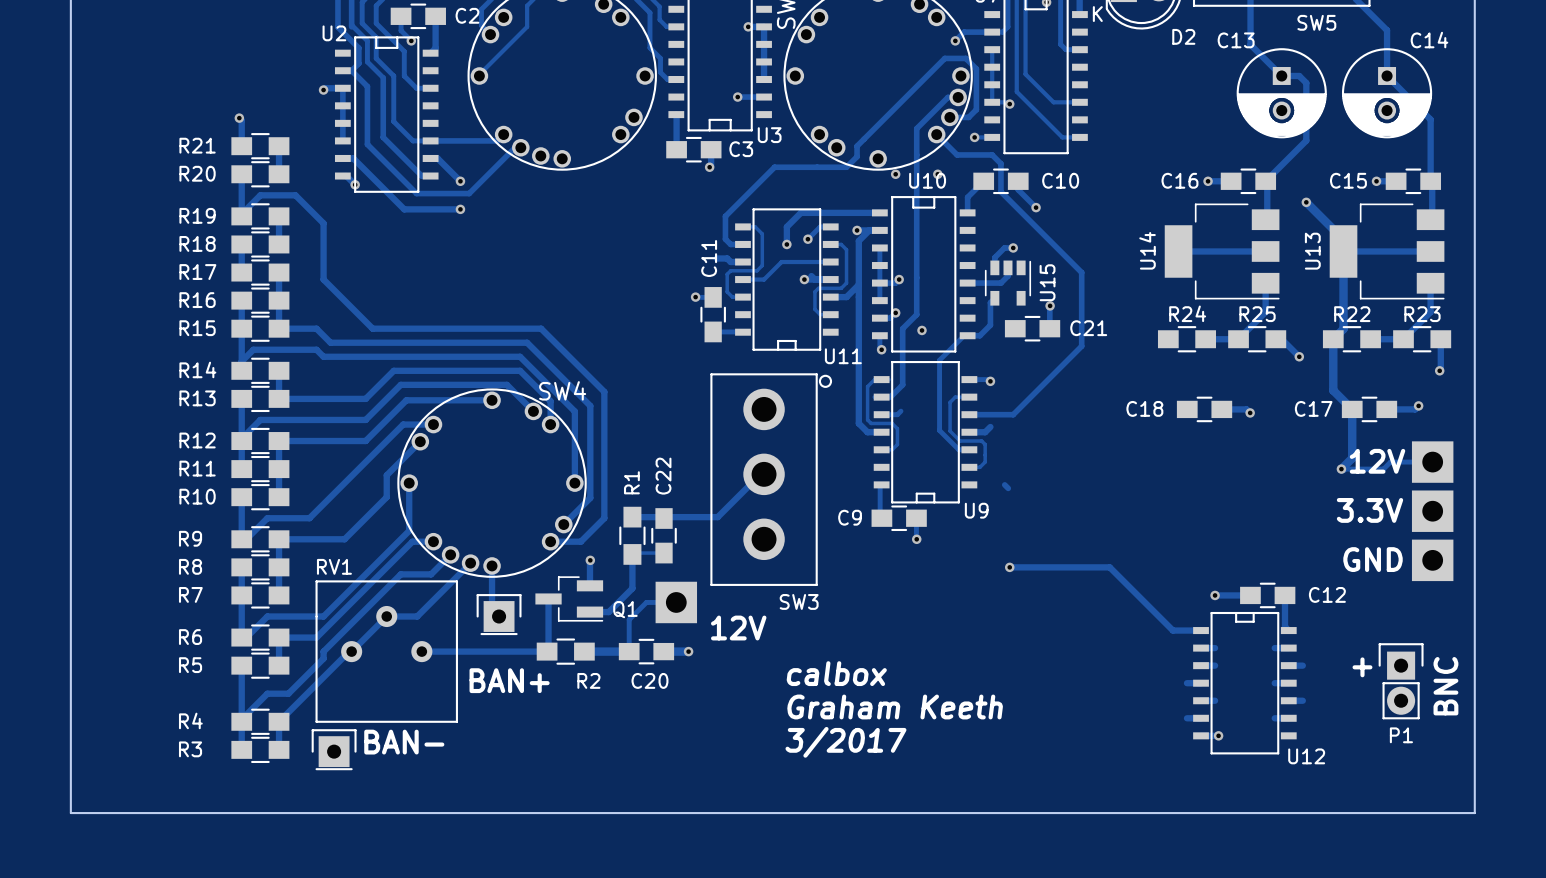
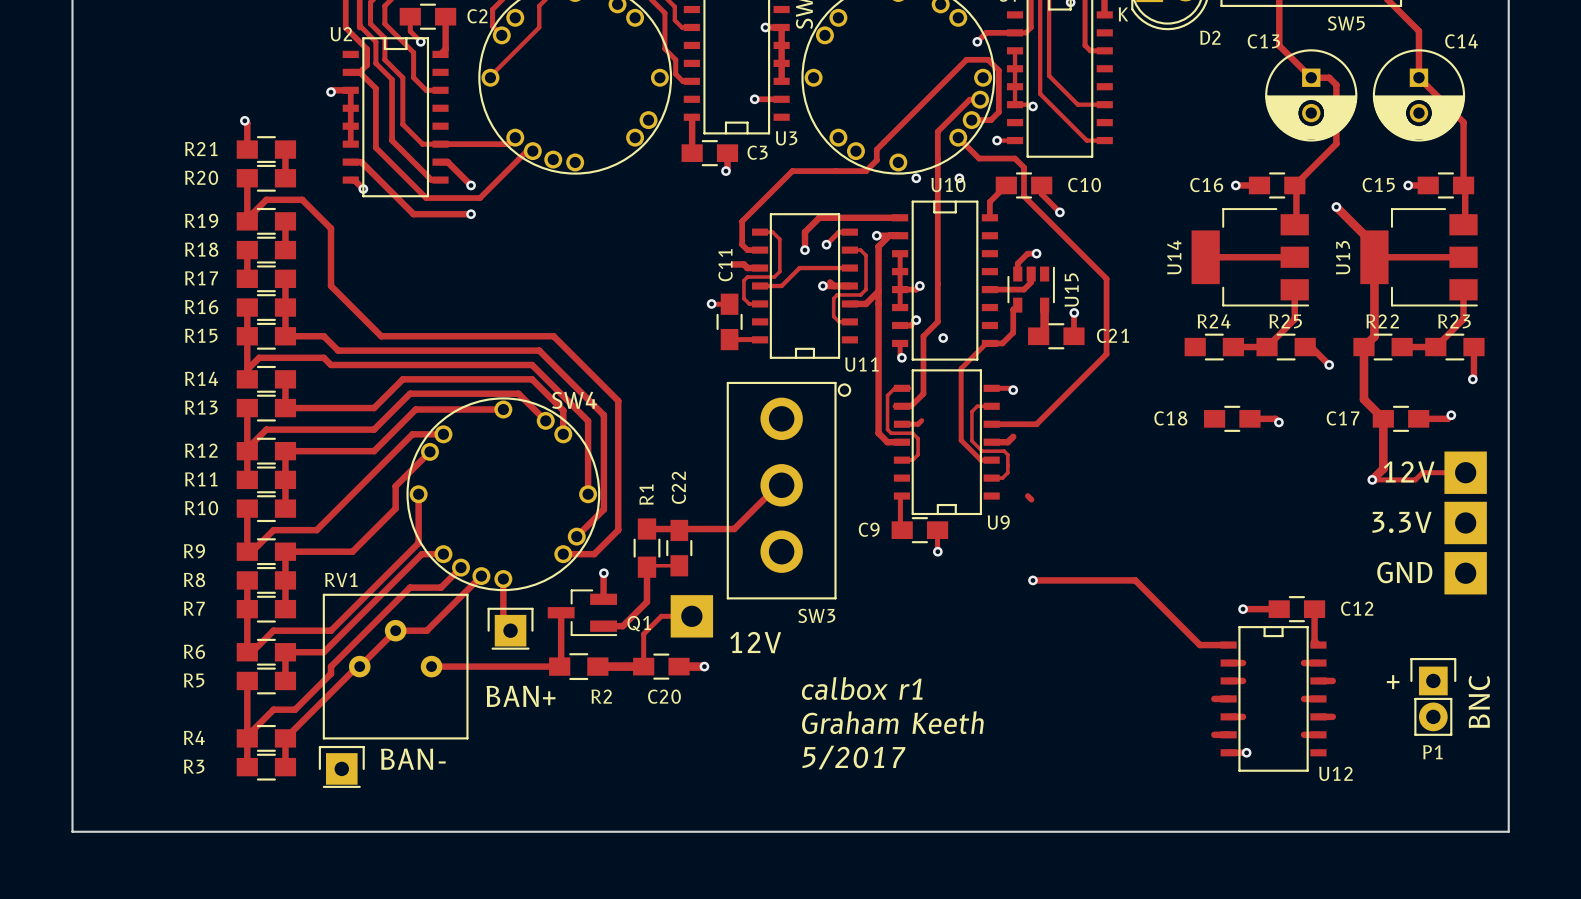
track: none -> (1044, 305) (1044, 330) (1038, 336)
text: calbox (836, 673) -> calbox r1 (862, 688)
text: 3/2017 (845, 742) -> 5/2017 (853, 757)

